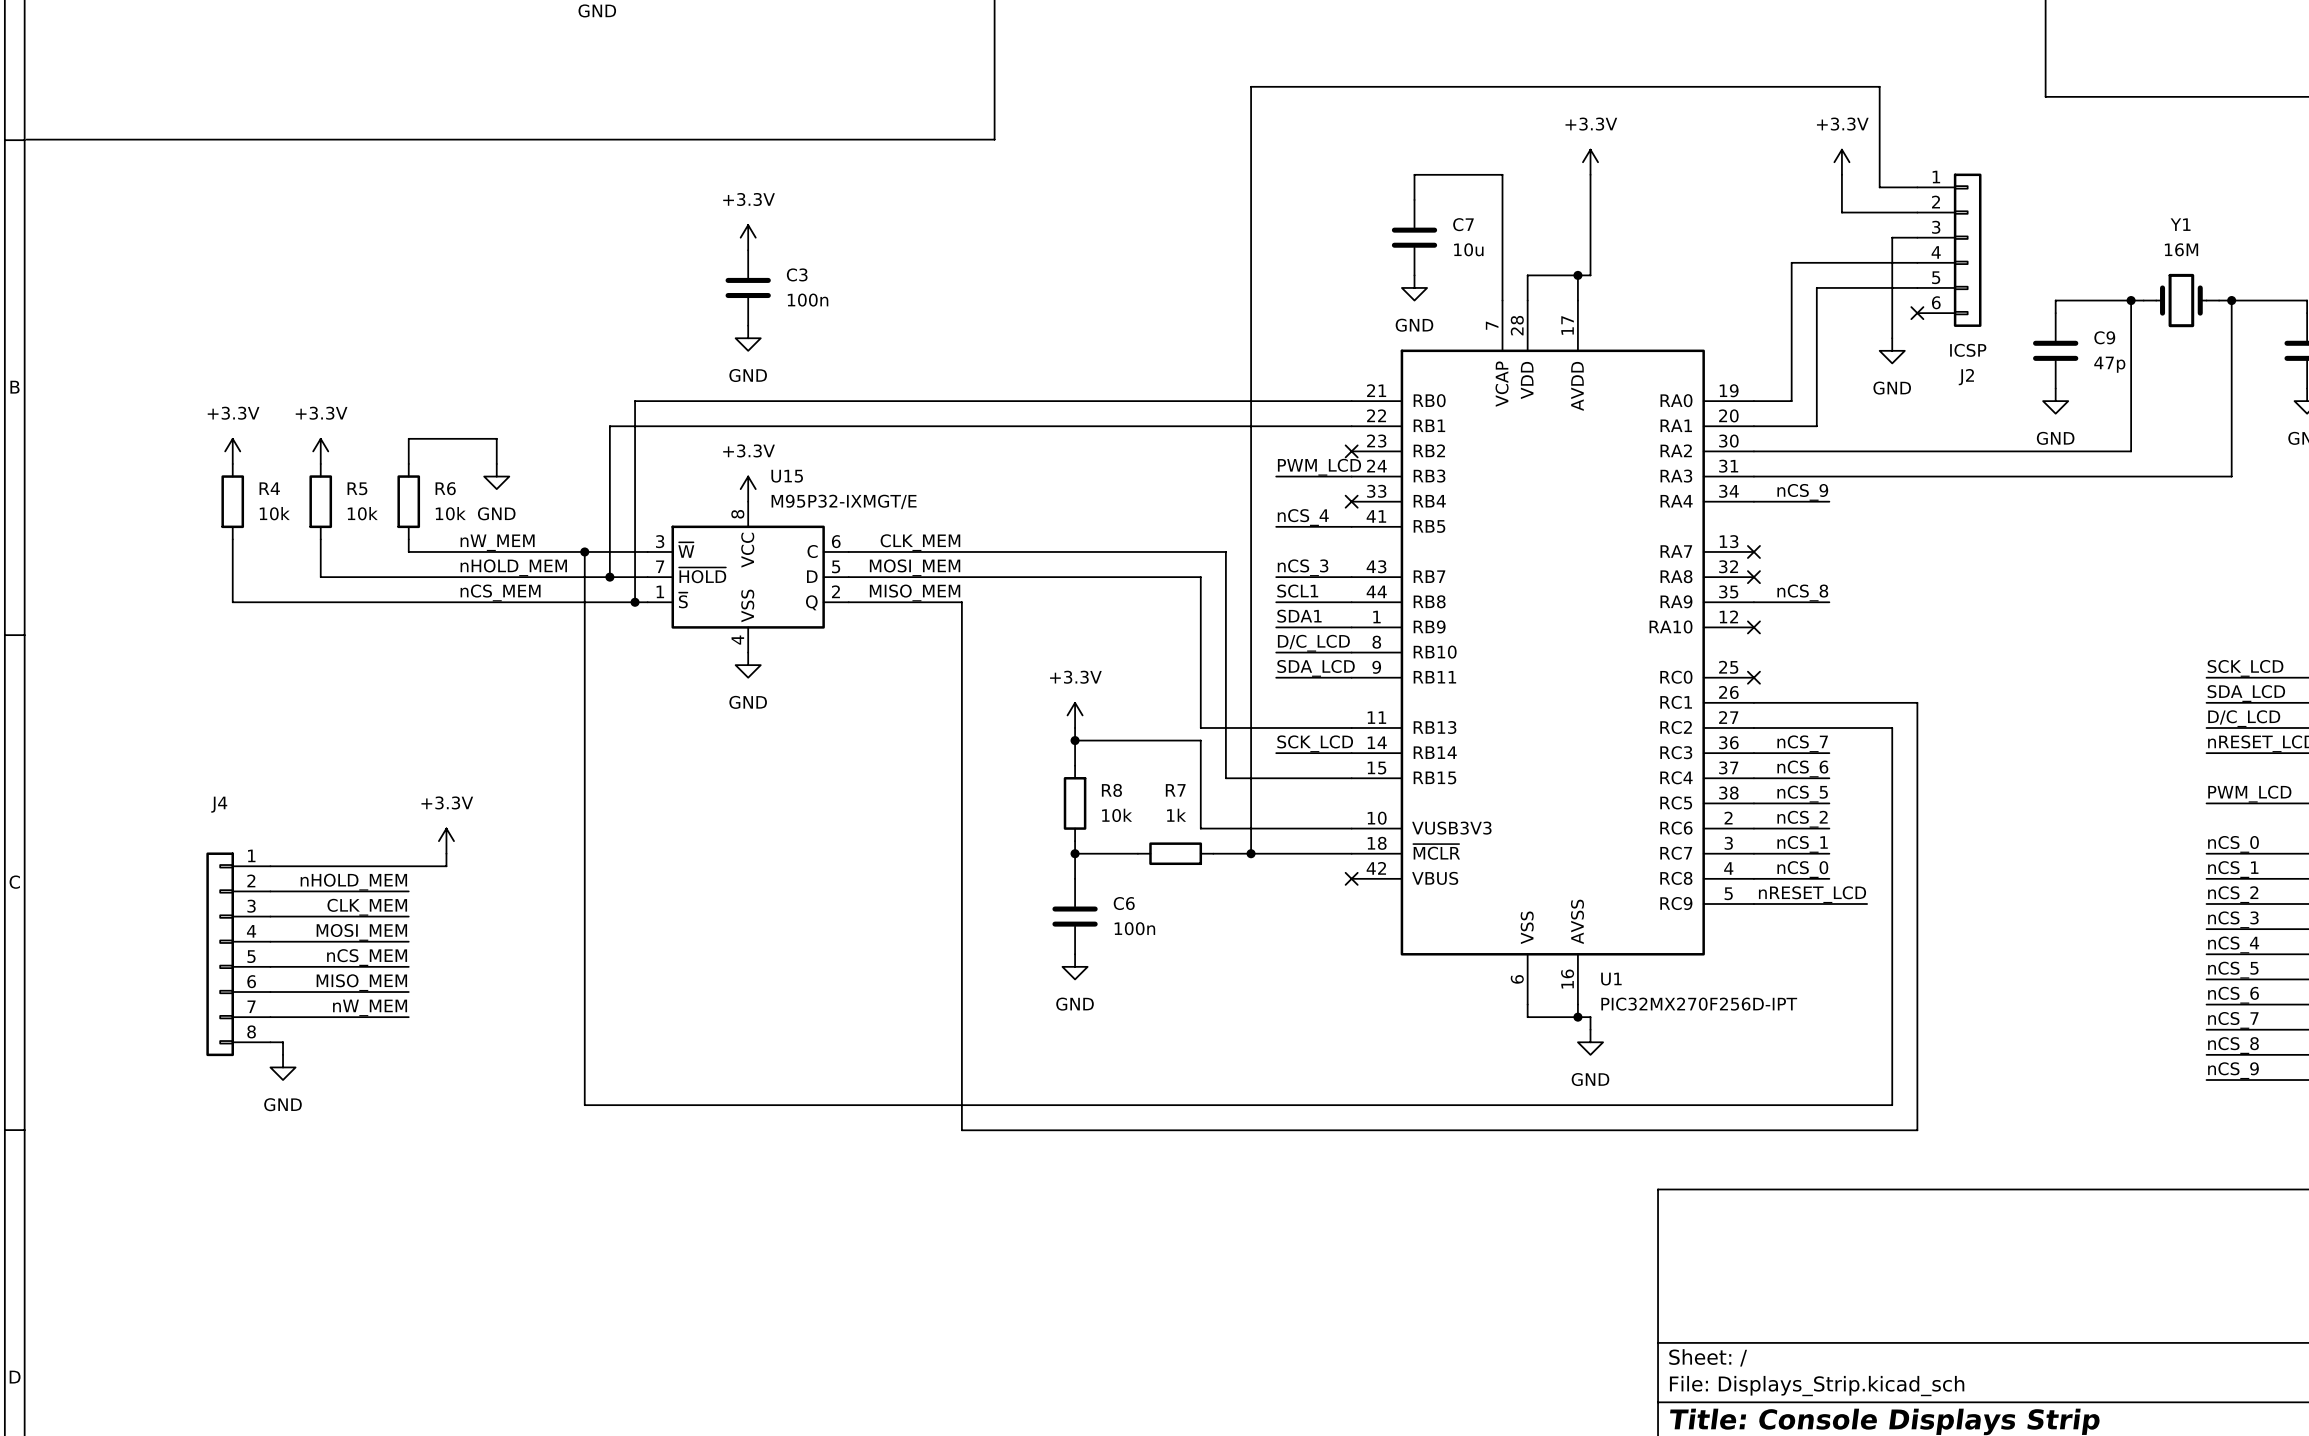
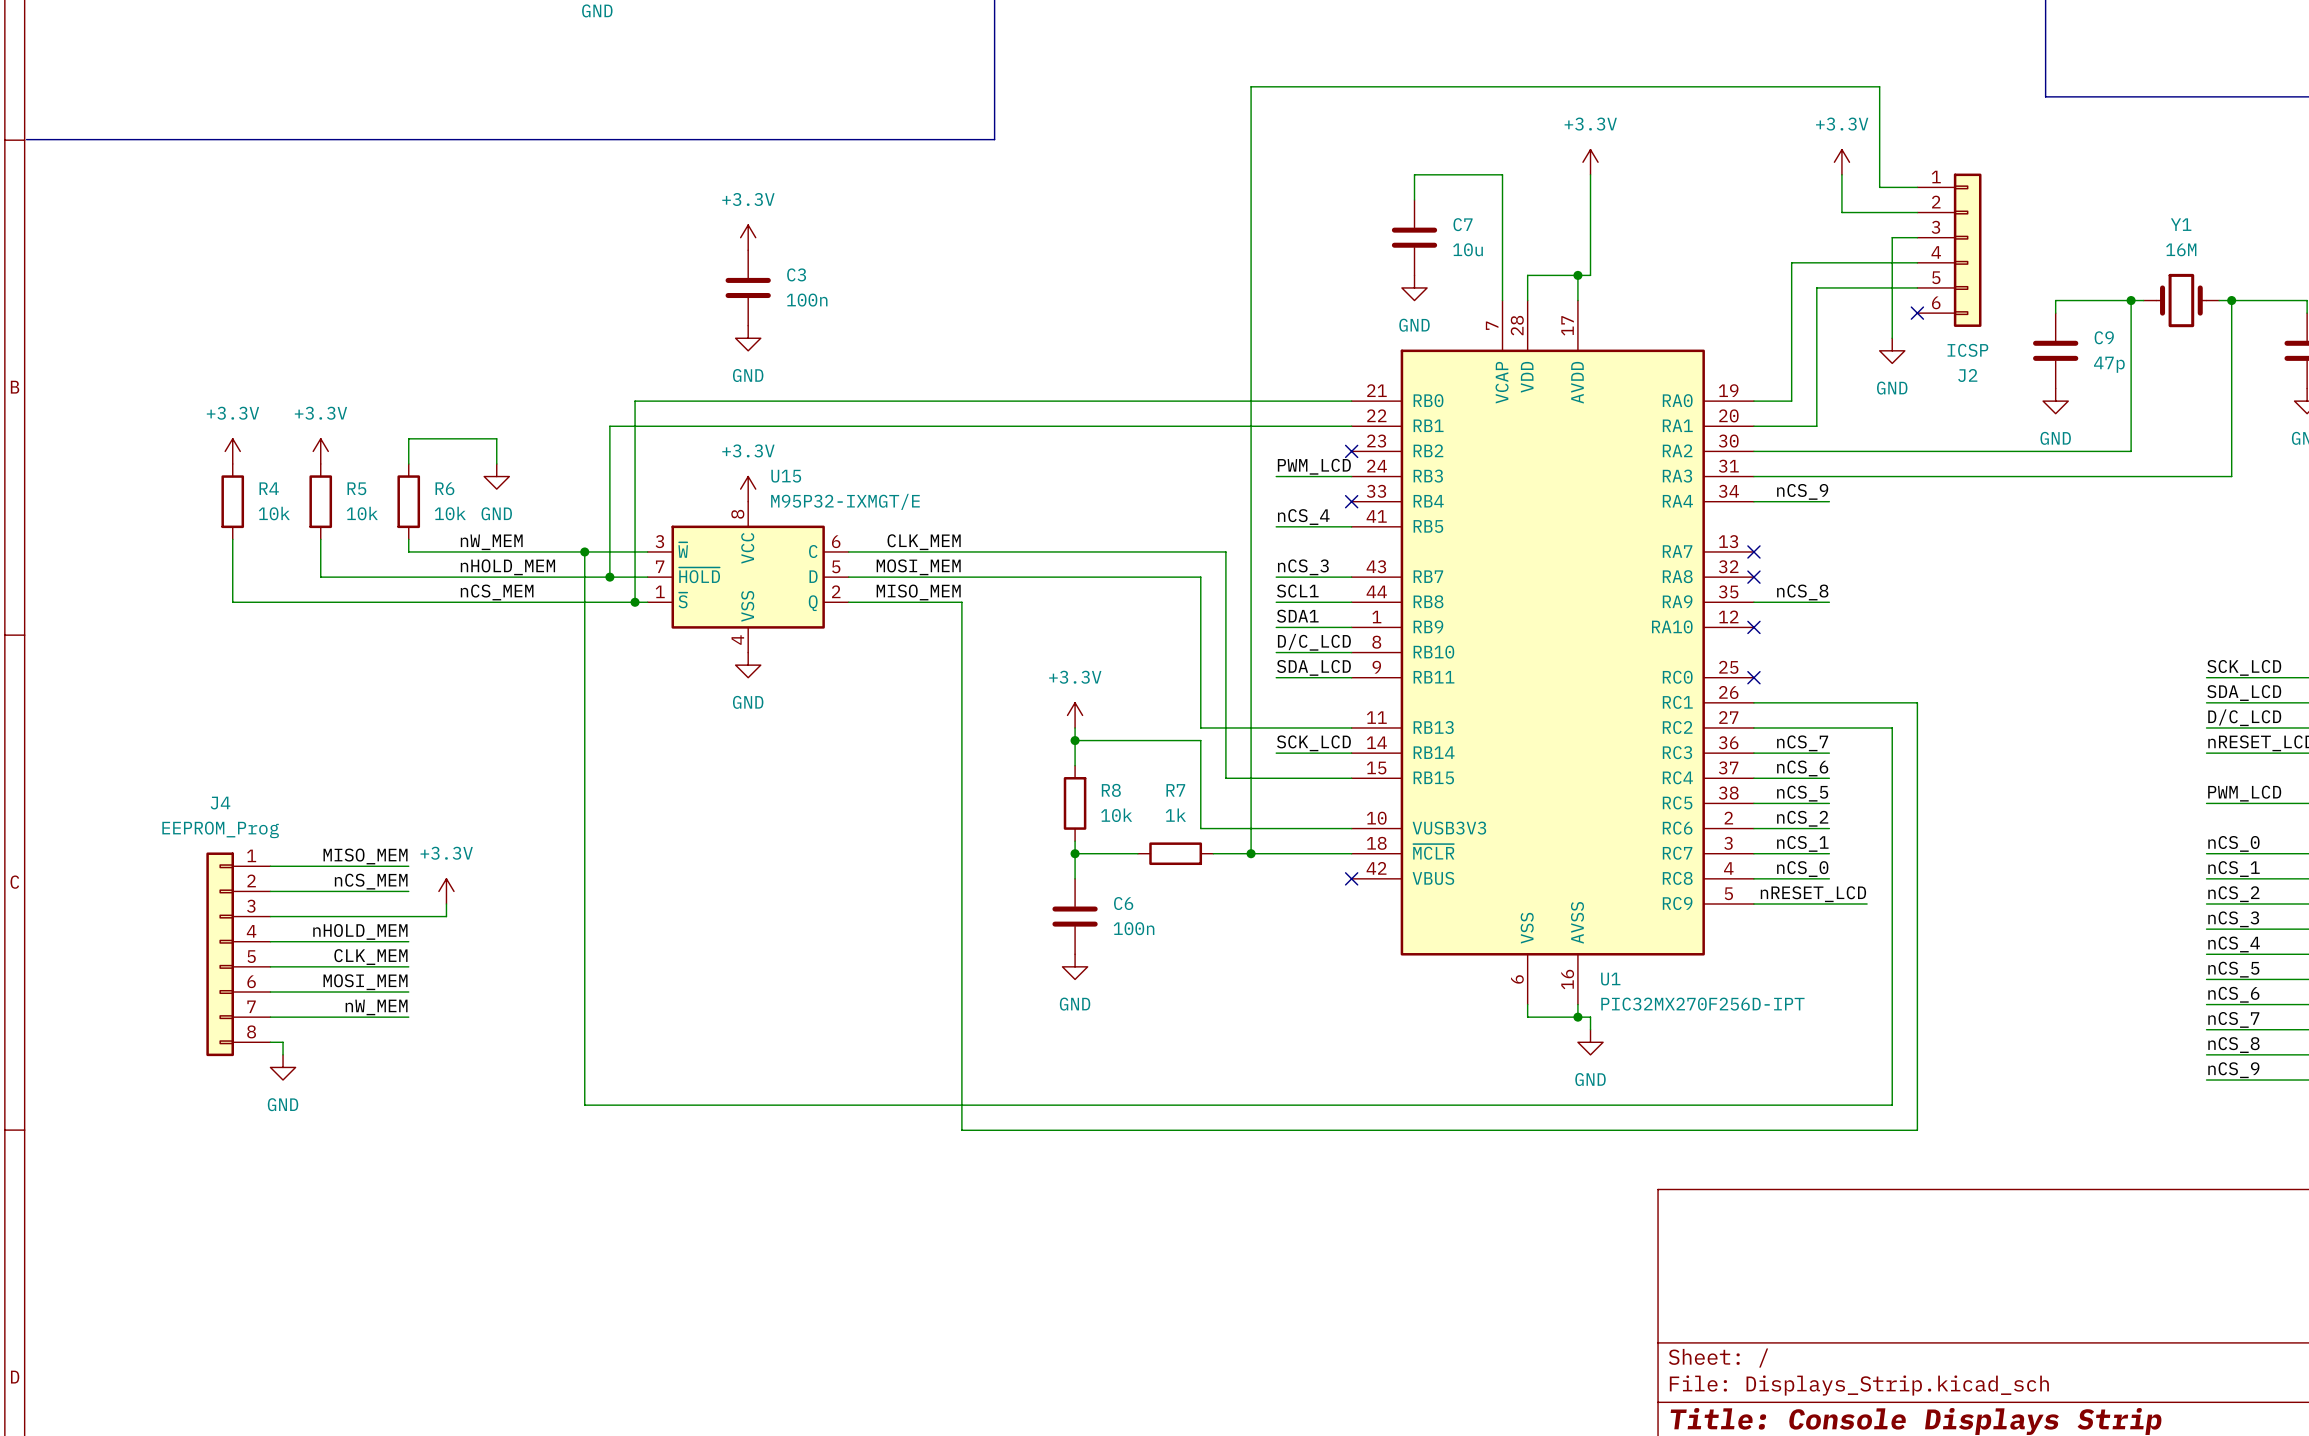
J4 value: none -> EEPROM_Prog (220, 829)
power symbol position: +3.3V (446, 841) -> +3.3V (446, 891)
wire: (446, 853) (446, 866) (408, 866) -> (446, 904) (446, 916) (408, 916)
label: none -> MISO_MEM (365, 856)
label: nHOLD_MEM (353, 882) -> nCS_MEM (371, 881)
label: CLK_MEM (367, 907) -> none
label: MOSI_MEM (361, 932) -> nHOLD_MEM (360, 931)
label: nCS_MEM (367, 957) -> CLK_MEM (370, 957)
label: MISO_MEM (361, 982) -> MOSI_MEM (365, 982)

